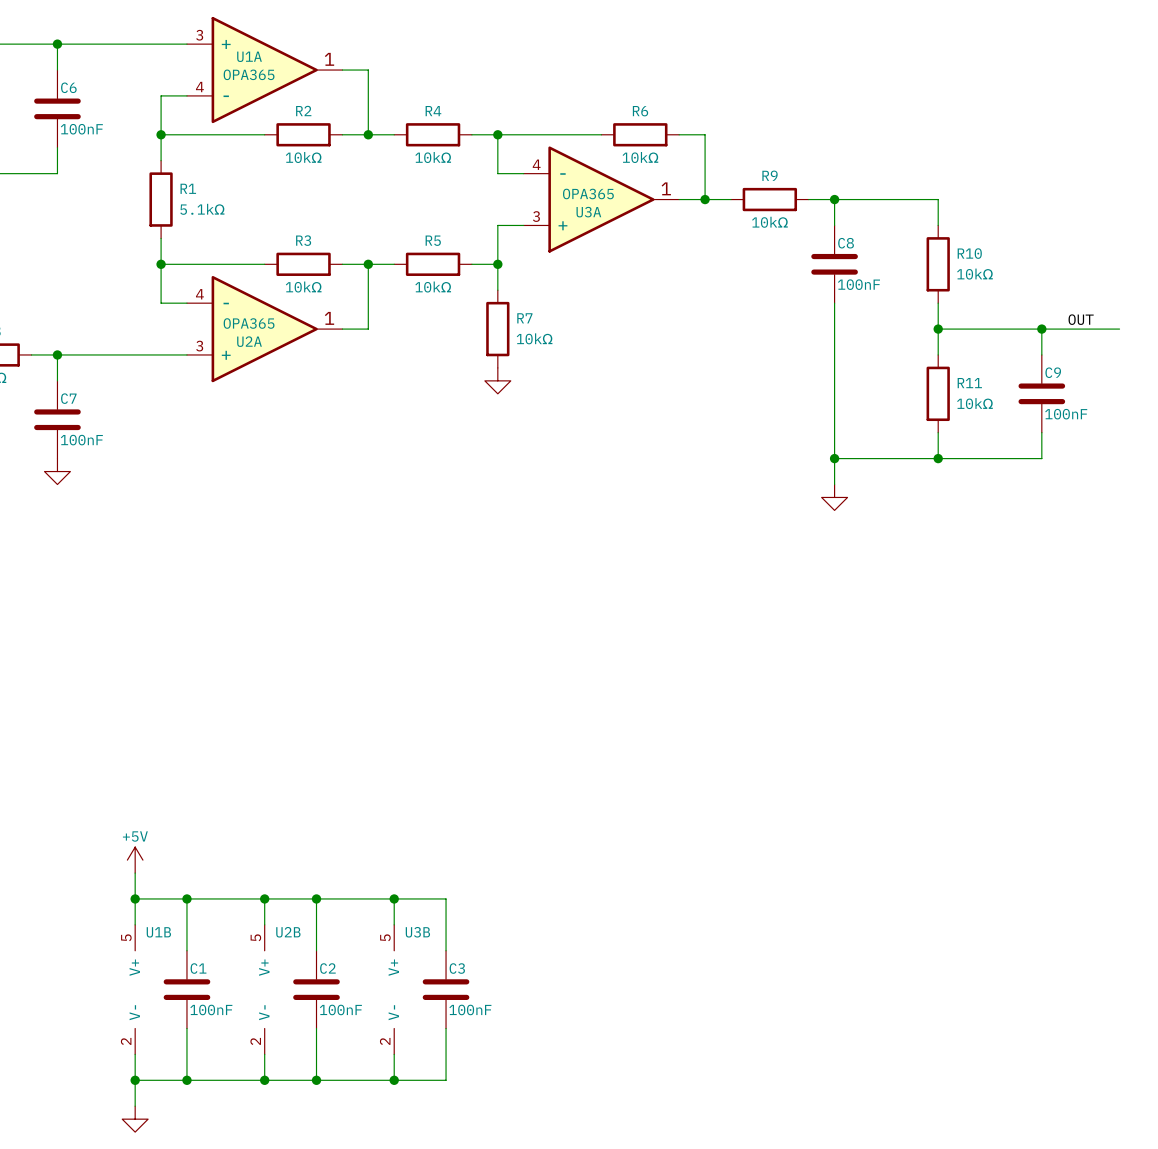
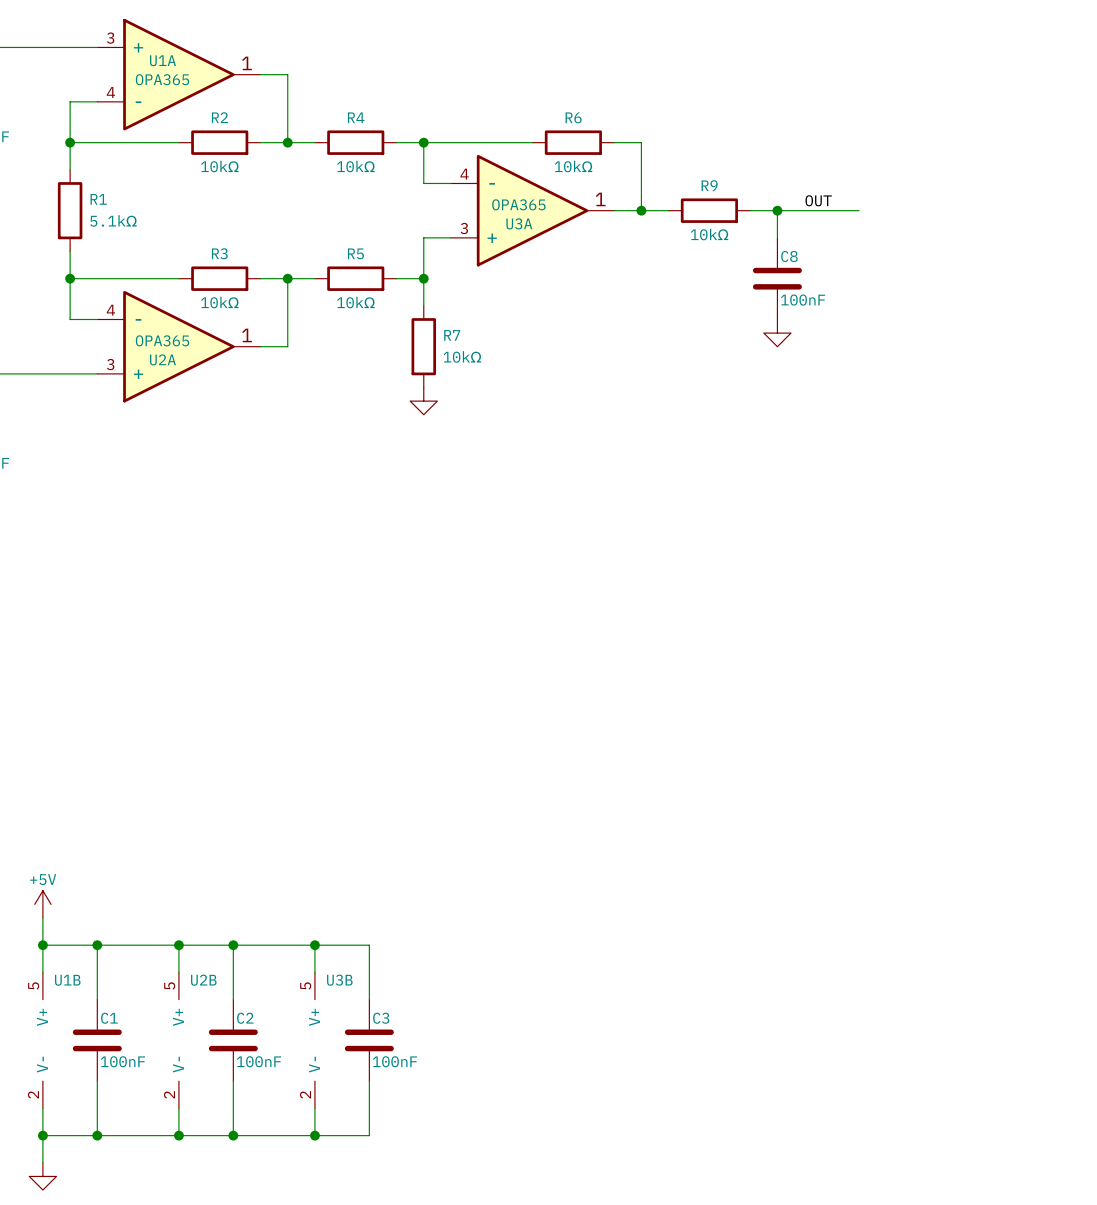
wire: (912, 199) (938, 199) (938, 225) -> none
R10: 10kΩ (938, 264) -> none
wire: (834, 303) (834, 484) -> none
wire: (938, 303) (938, 354) -> none
label position: OUT (1081, 319) -> OUT (818, 200)
wire: (938, 329) (1119, 329) -> none
junction: (938, 329) -> none
wire: (1041, 329) (1041, 354) -> none
junction: (1041, 329) -> none
R11: 10kΩ (938, 393) -> none
C9: 100nF (1041, 393) -> none
wire: (938, 432) (938, 458) -> none
wire: (1041, 432) (1041, 458) (834, 458) -> none
junction: (834, 458) -> none
junction: (938, 458) -> none
power symbol position: (834, 497) -> (777, 333)

